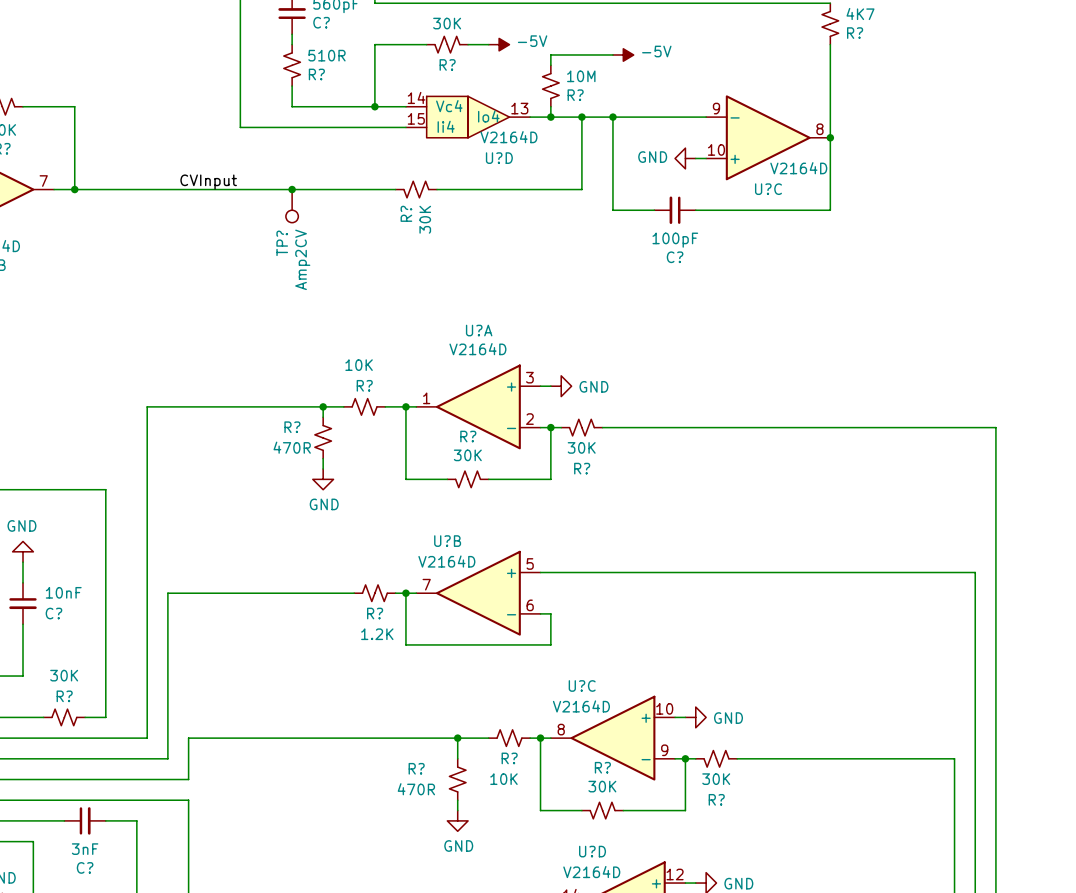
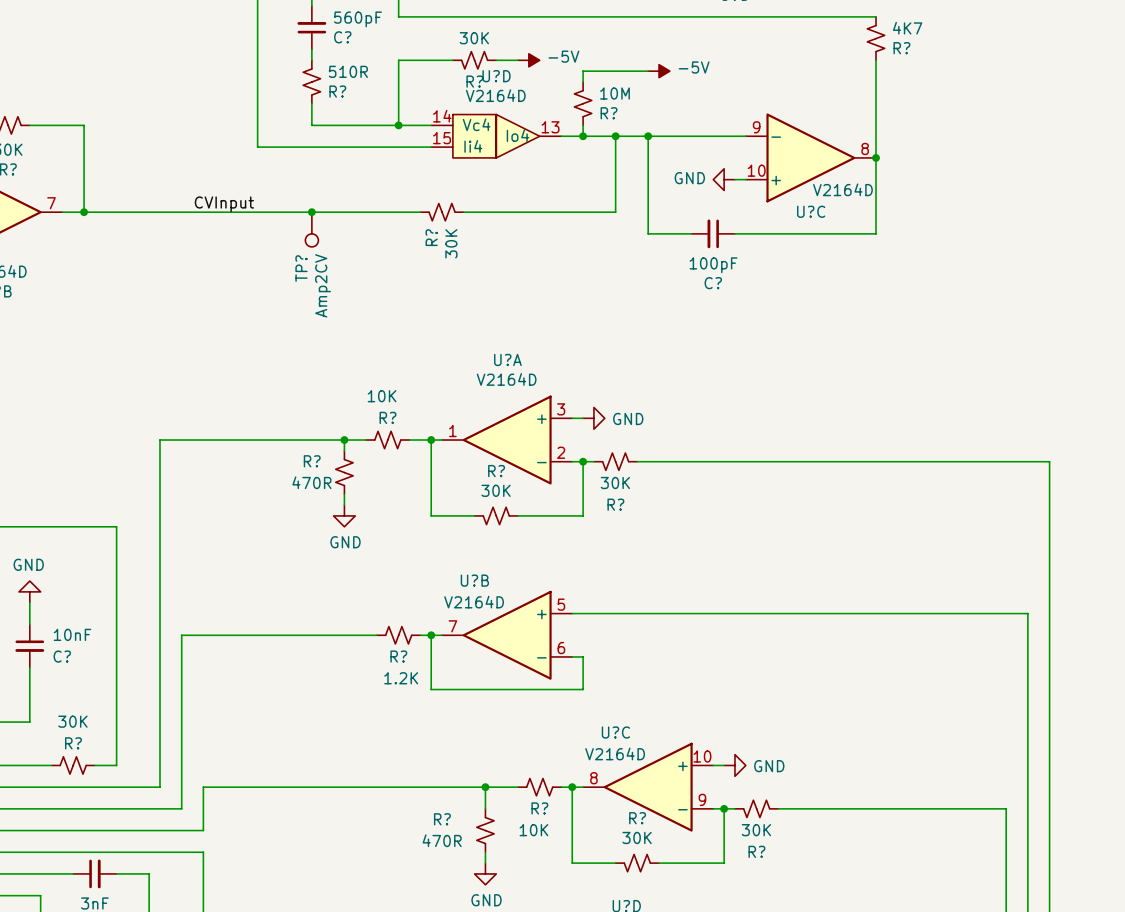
U?D value position: V2164D (508, 137) -> V2164D (495, 95)
U?D name position: U?D (499, 158) -> U?D (496, 76)

